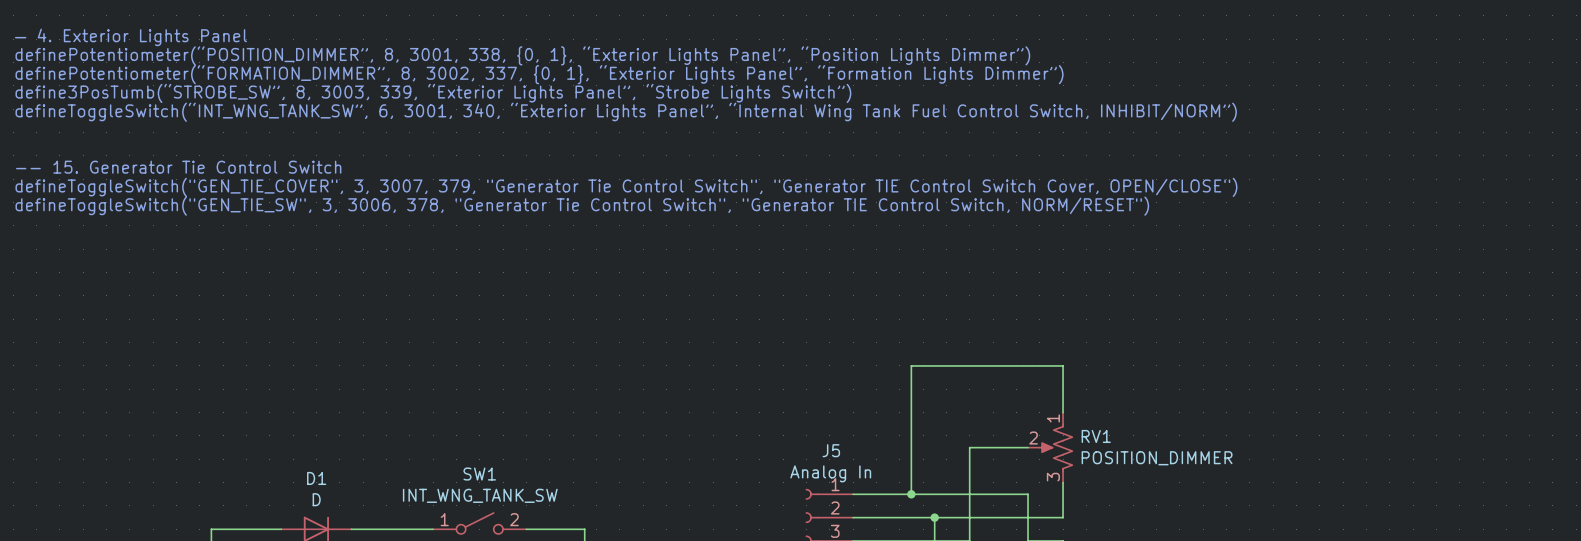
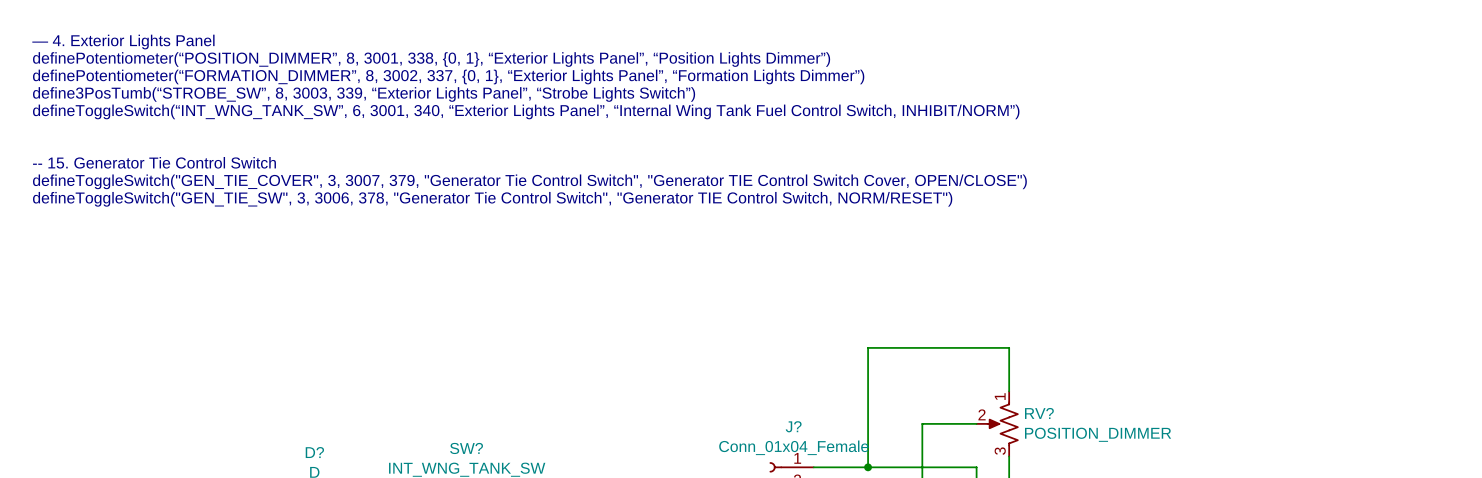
RV1 name: RV1 (1096, 436) -> RV? (1039, 413)
J5 name: J5 (831, 450) -> J? (793, 426)
J5 value: Analog In (830, 473) -> Conn_01x04_Female (793, 447)
SW1 name: SW1 (479, 474) -> SW? (466, 448)
D1 name: D1 (316, 478) -> D? (314, 452)

